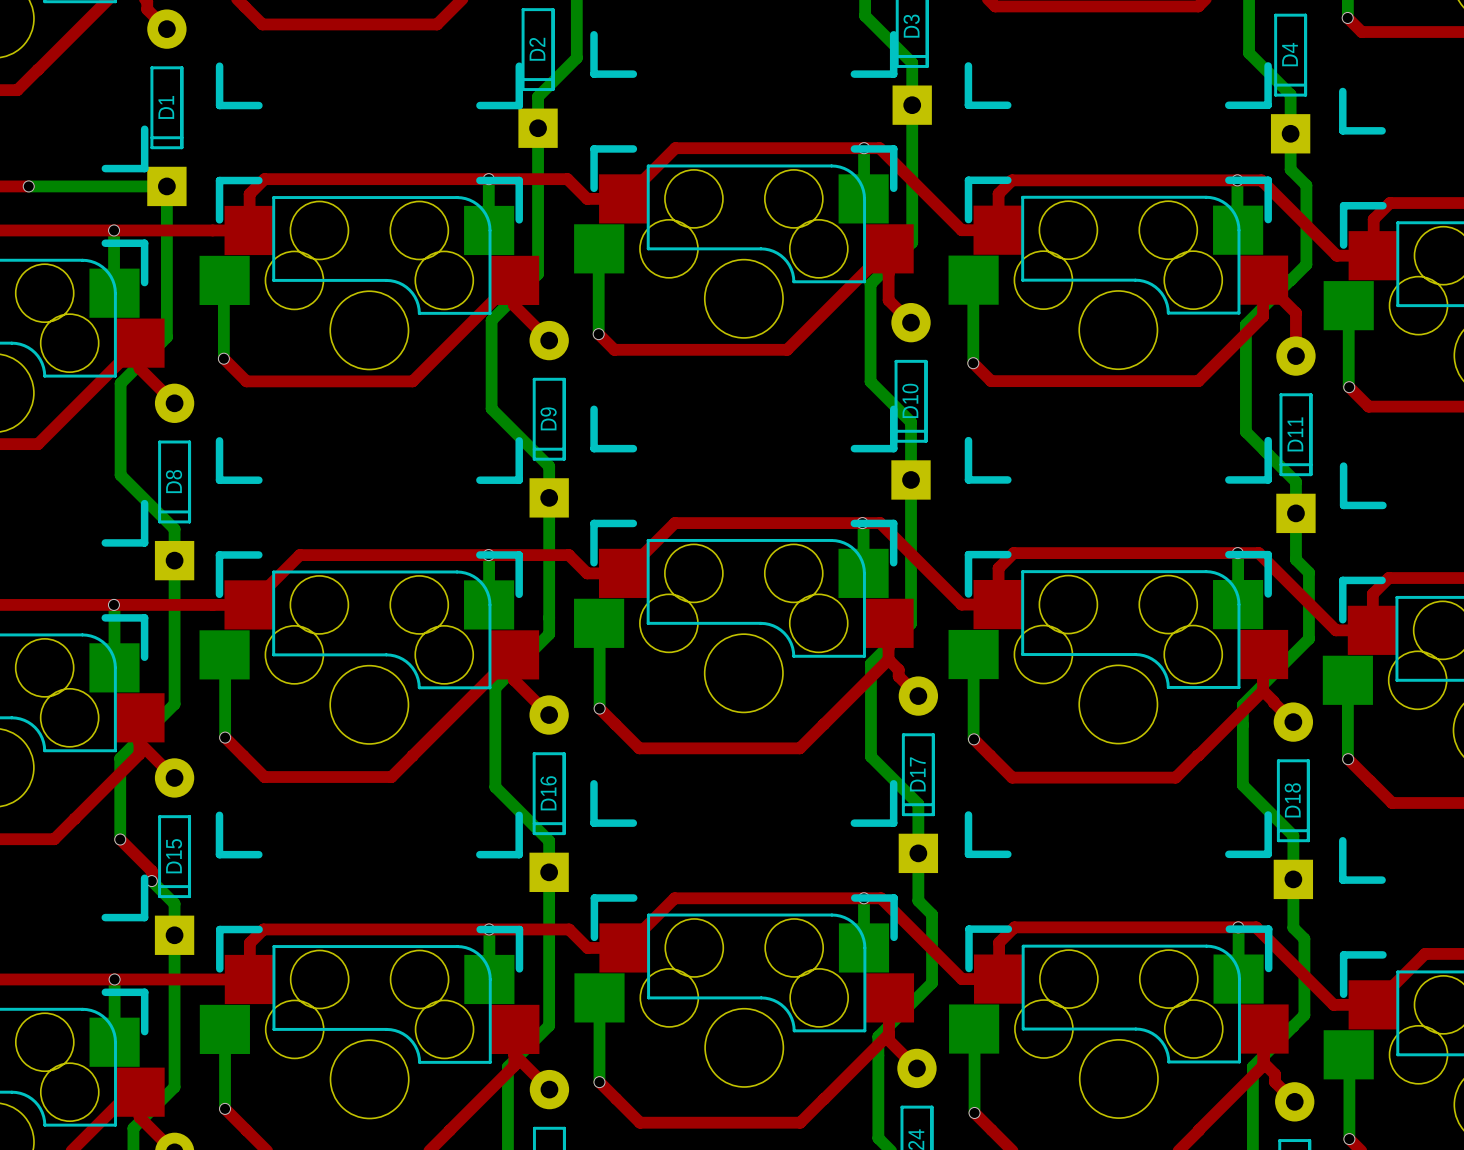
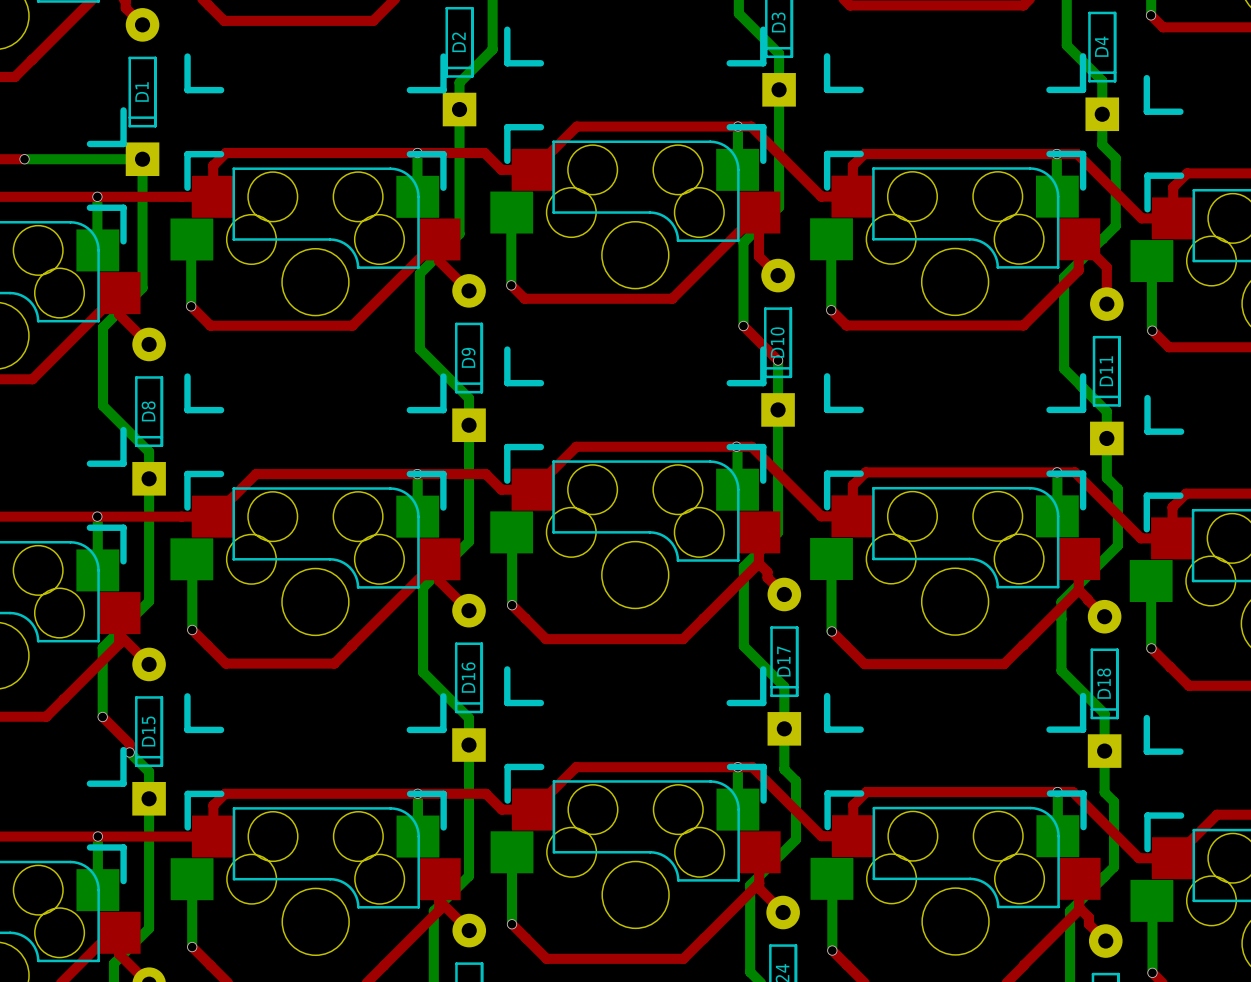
top track: none -> (743, 326) (778, 360)
bottom track: (870, 381) (911, 422) -> none
via: none -> (743, 326)
via: none -> (778, 360)

